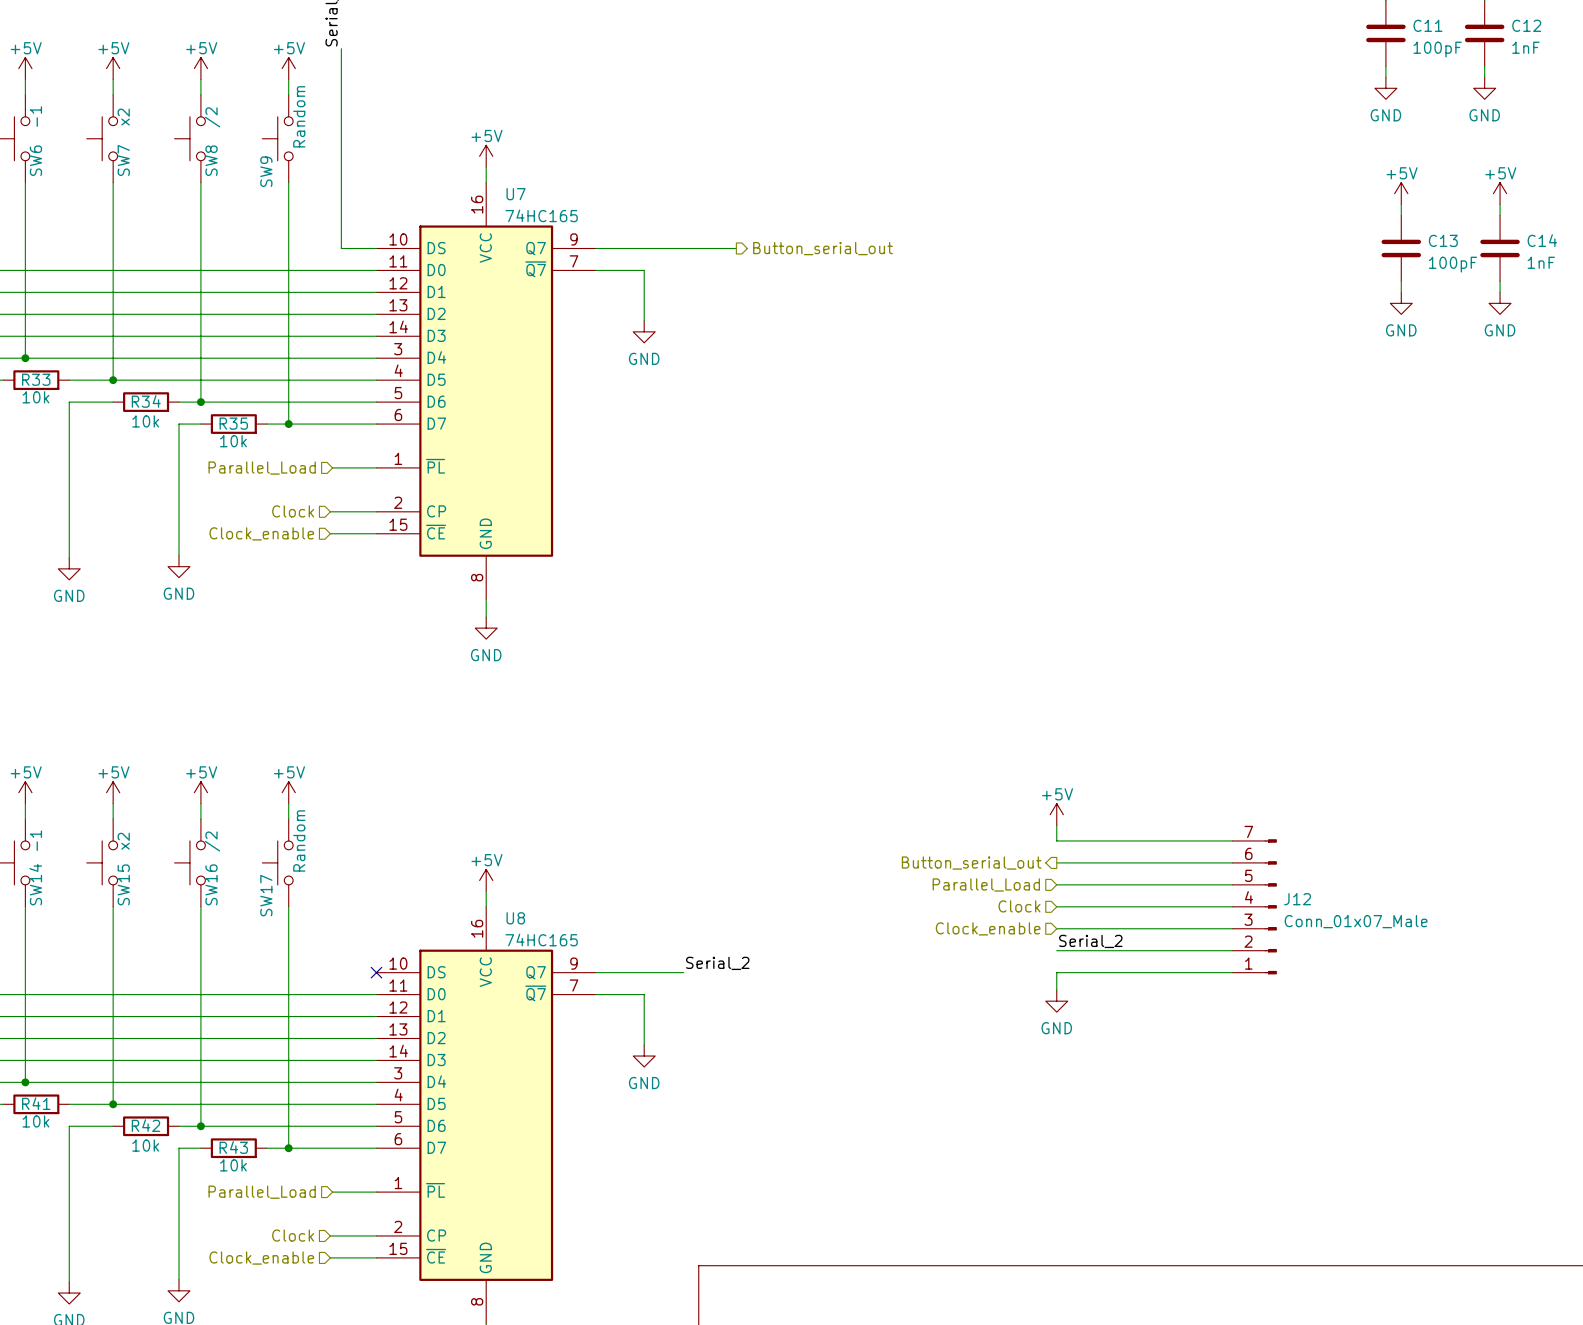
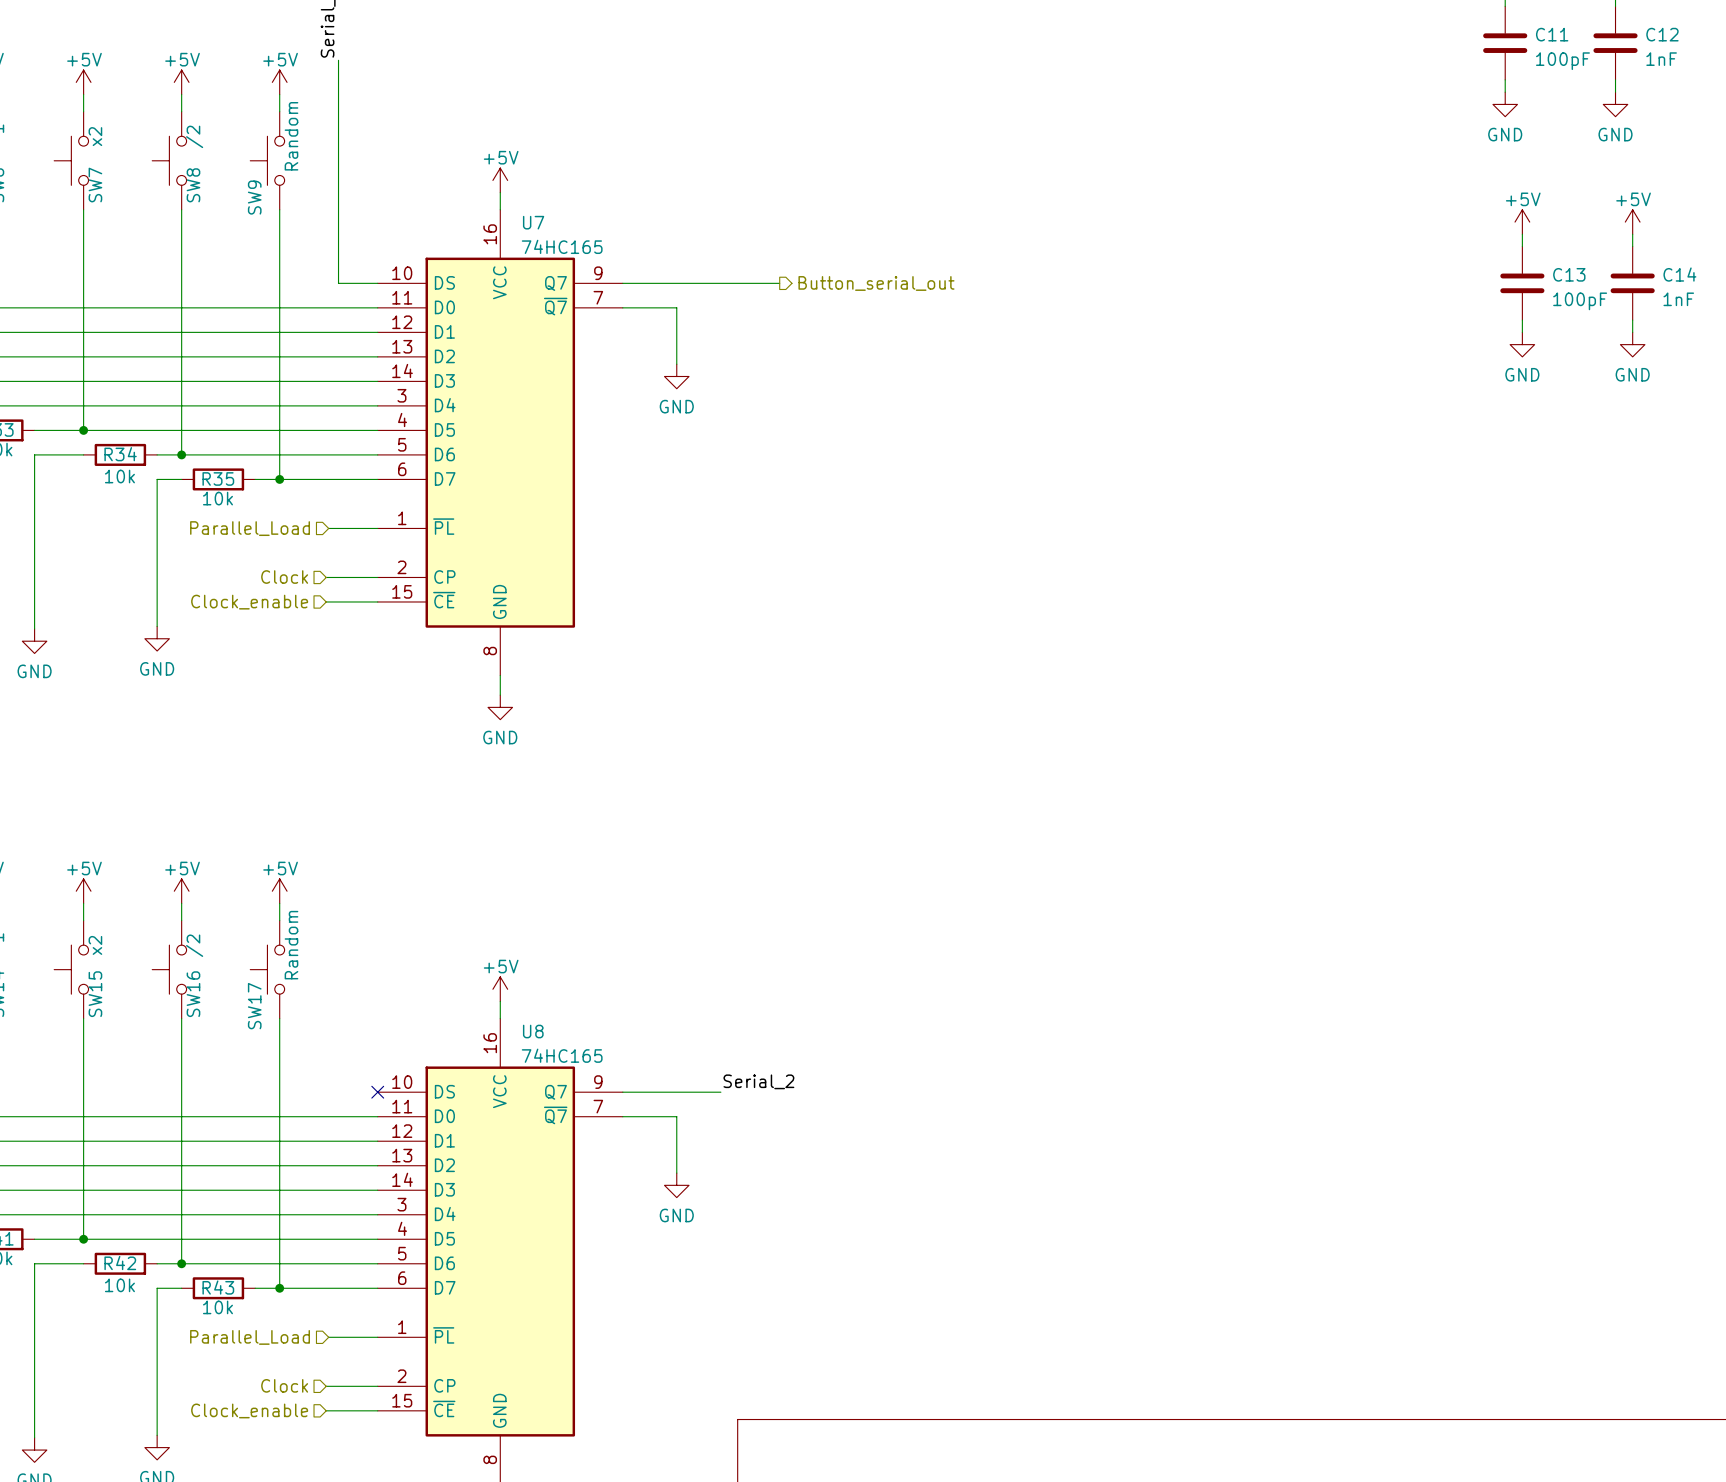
power symbol: +5V (1056, 814) -> none
wire: (1056, 825) (1056, 840) (1232, 840) -> none
wire: (1056, 862) (1232, 862) -> none
hierarchical label: Button_serial_out (971, 863) -> none
hierarchical label: Parallel_Load (986, 884) -> none
wire: (1056, 884) (1232, 884) -> none
hierarchical label: Clock (1019, 906) -> none
wire: (1056, 906) (1232, 906) -> none
J12: Conn_01x07_Male (1254, 906) -> none
hierarchical label: Clock_enable (988, 928) -> none
wire: (1056, 928) (1232, 928) -> none
label: Serial_2 (1090, 941) -> none
wire: (1056, 950) (1232, 950) -> none
wire: (1232, 972) (1056, 972) (1056, 990) -> none
power symbol: GND (1056, 1001) -> none

